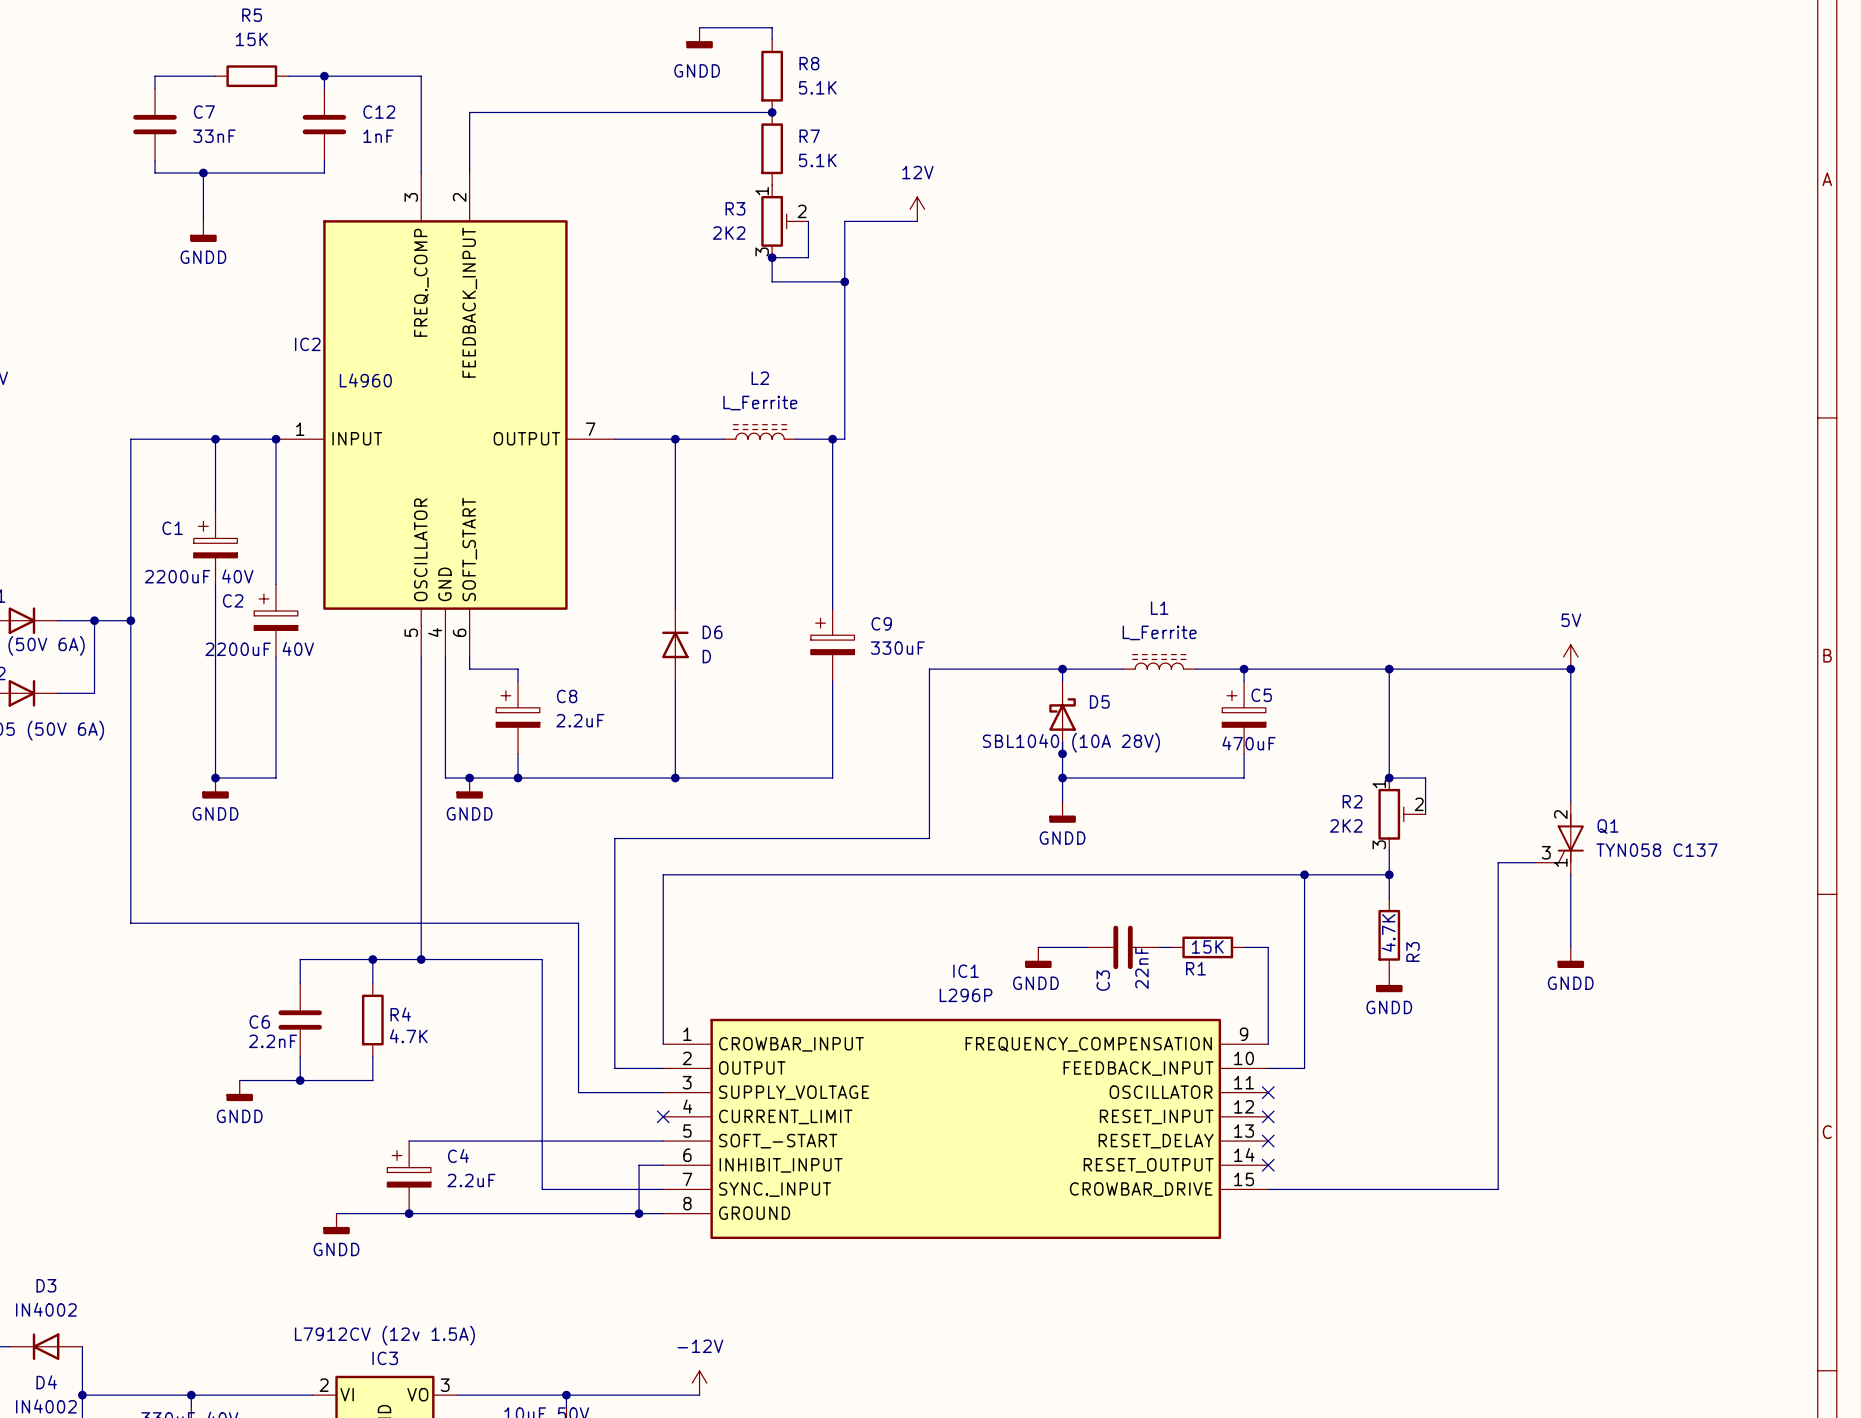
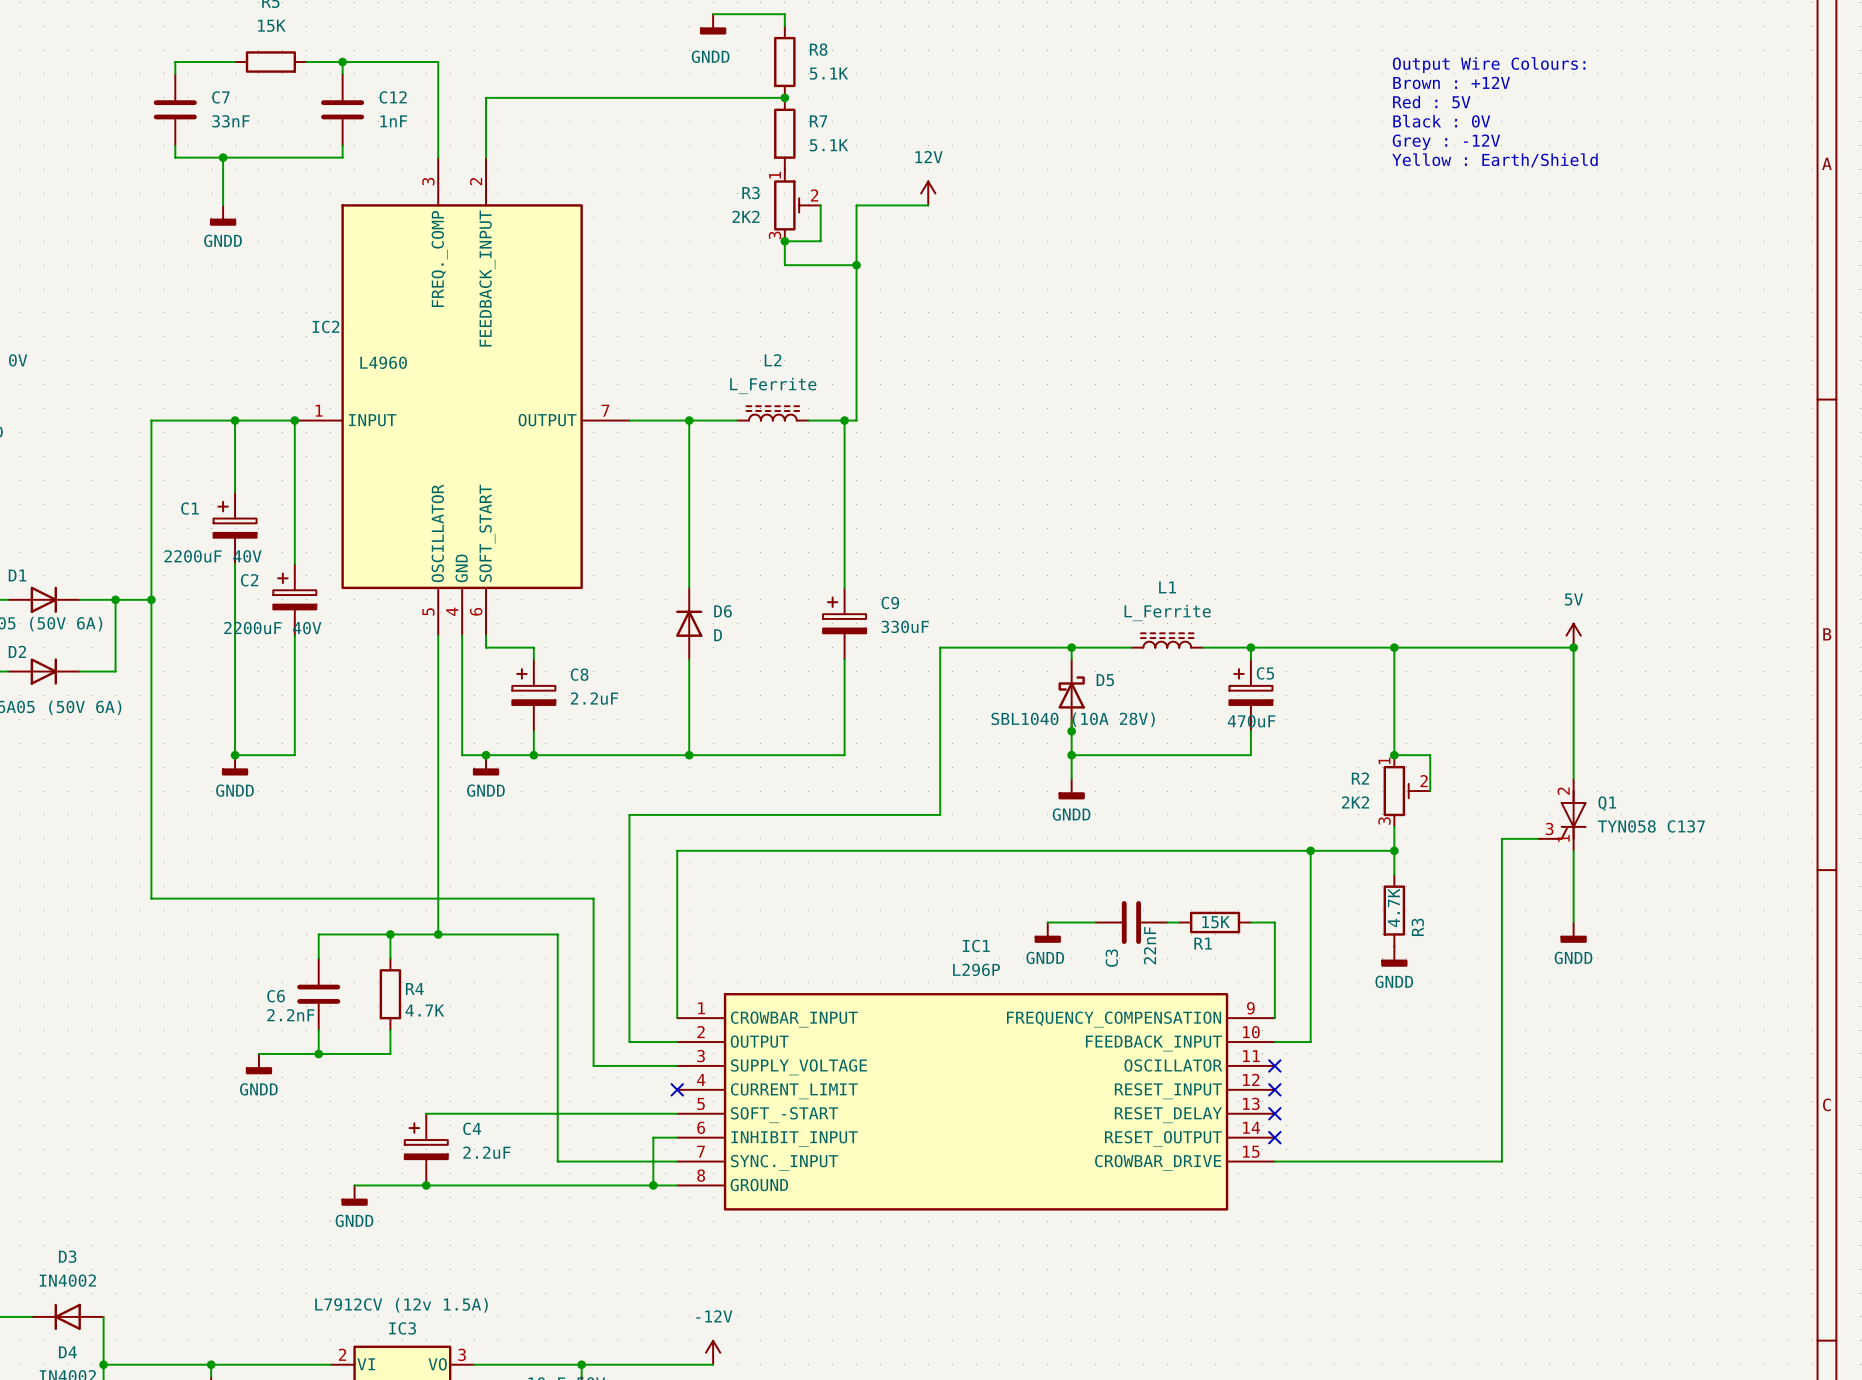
text: none -> Output Wire Colours: (1489, 65)
text: none -> Brown : +12V (1451, 82)
text: none -> Red : 5V (1431, 102)
text: none -> Black : 0V (1441, 121)
text: none -> Grey : -12V (1446, 142)
text: none -> Yellow : Earth/Shield (1494, 160)

